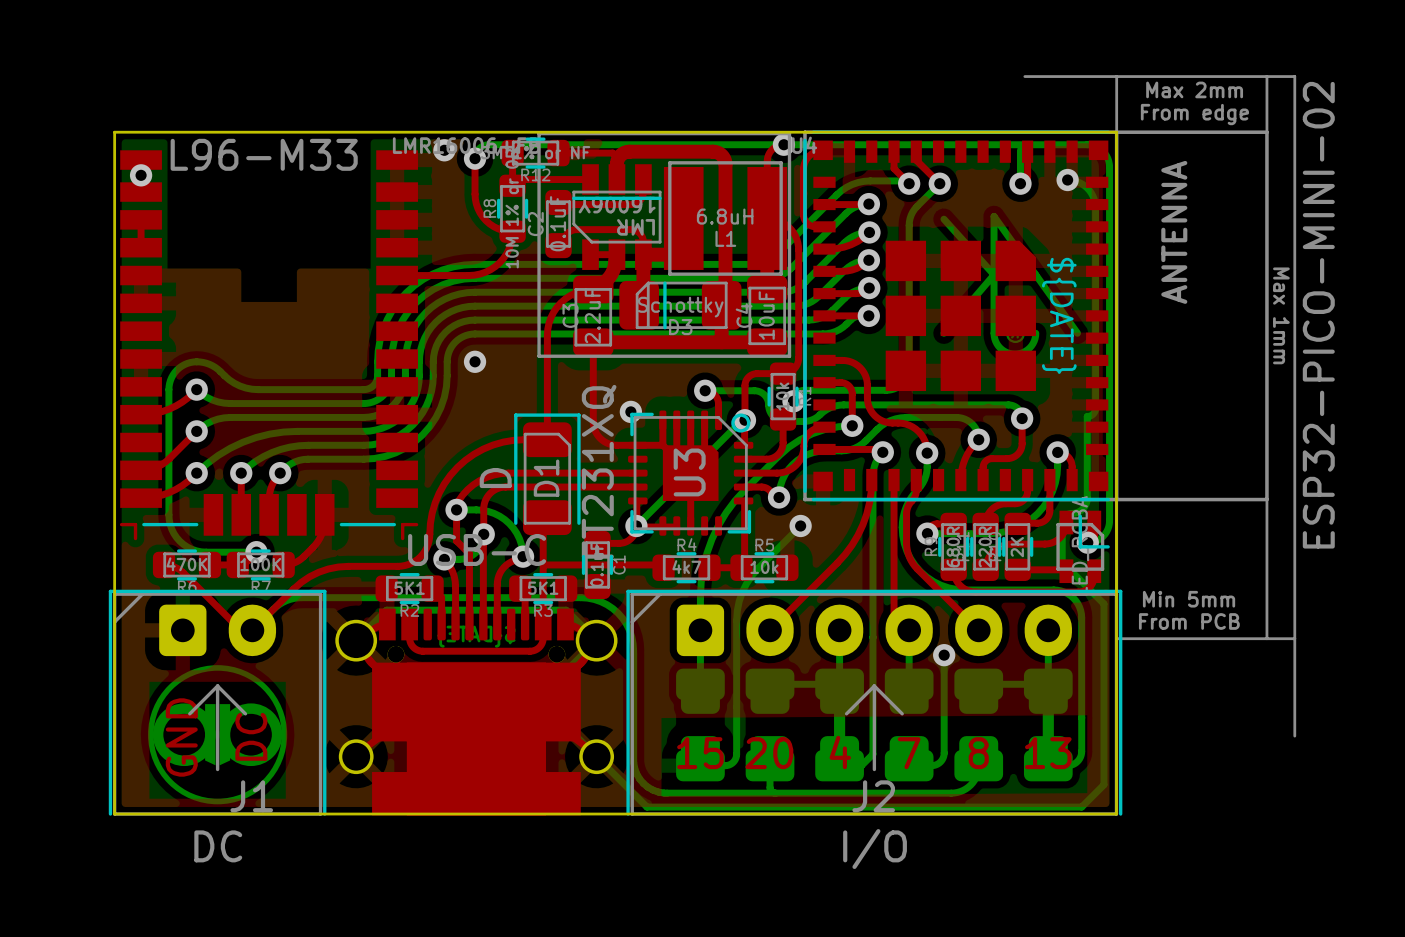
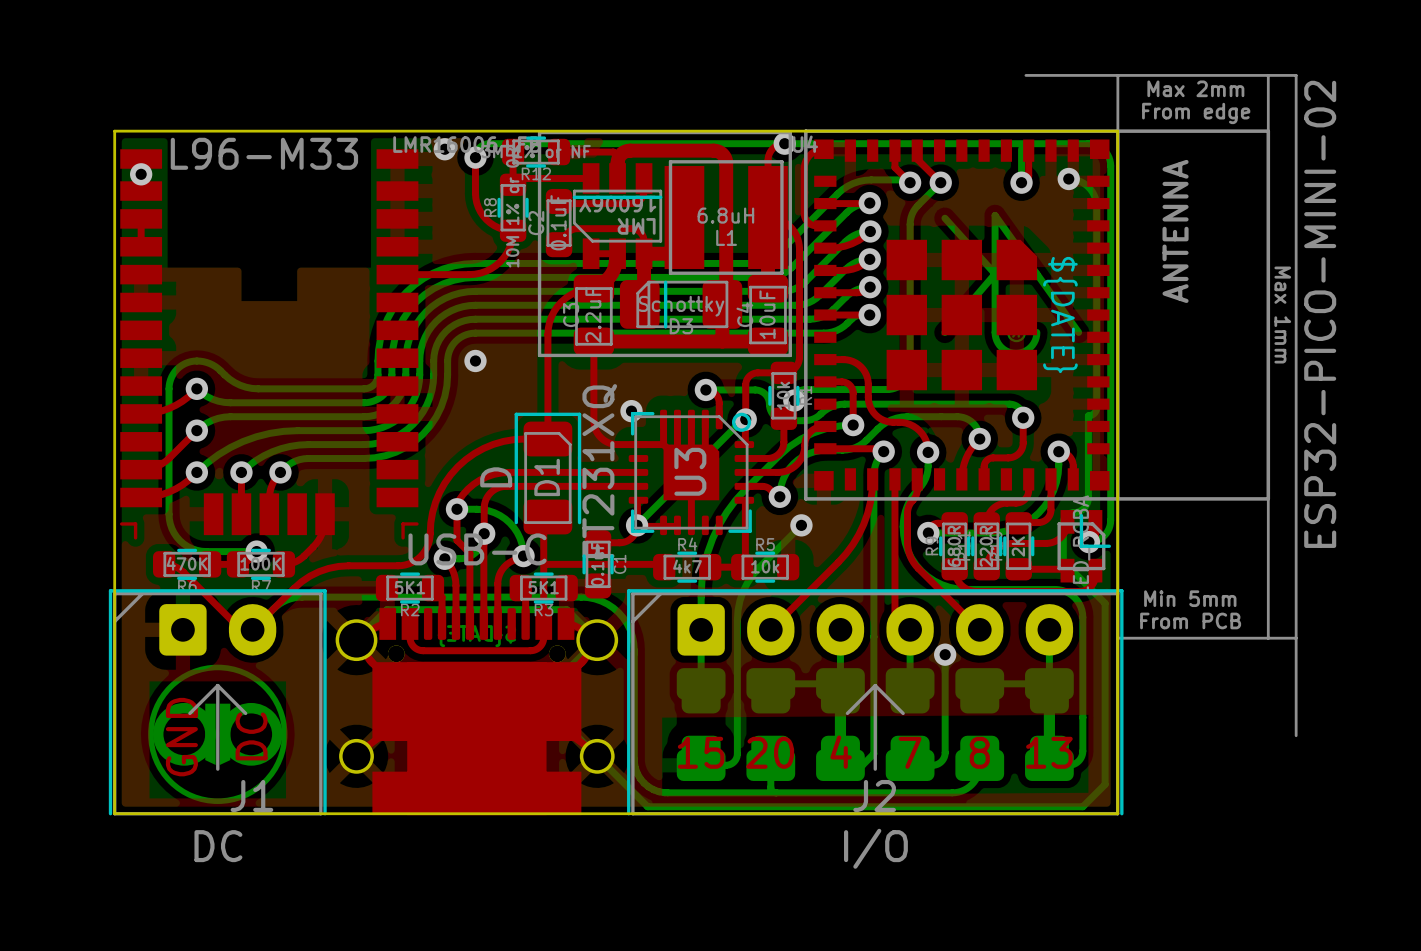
part footprint: [803, 75, 1297, 738] -> [804, 74, 1298, 738]
part footprint: [119, 150, 419, 541] -> [119, 149, 419, 540]

